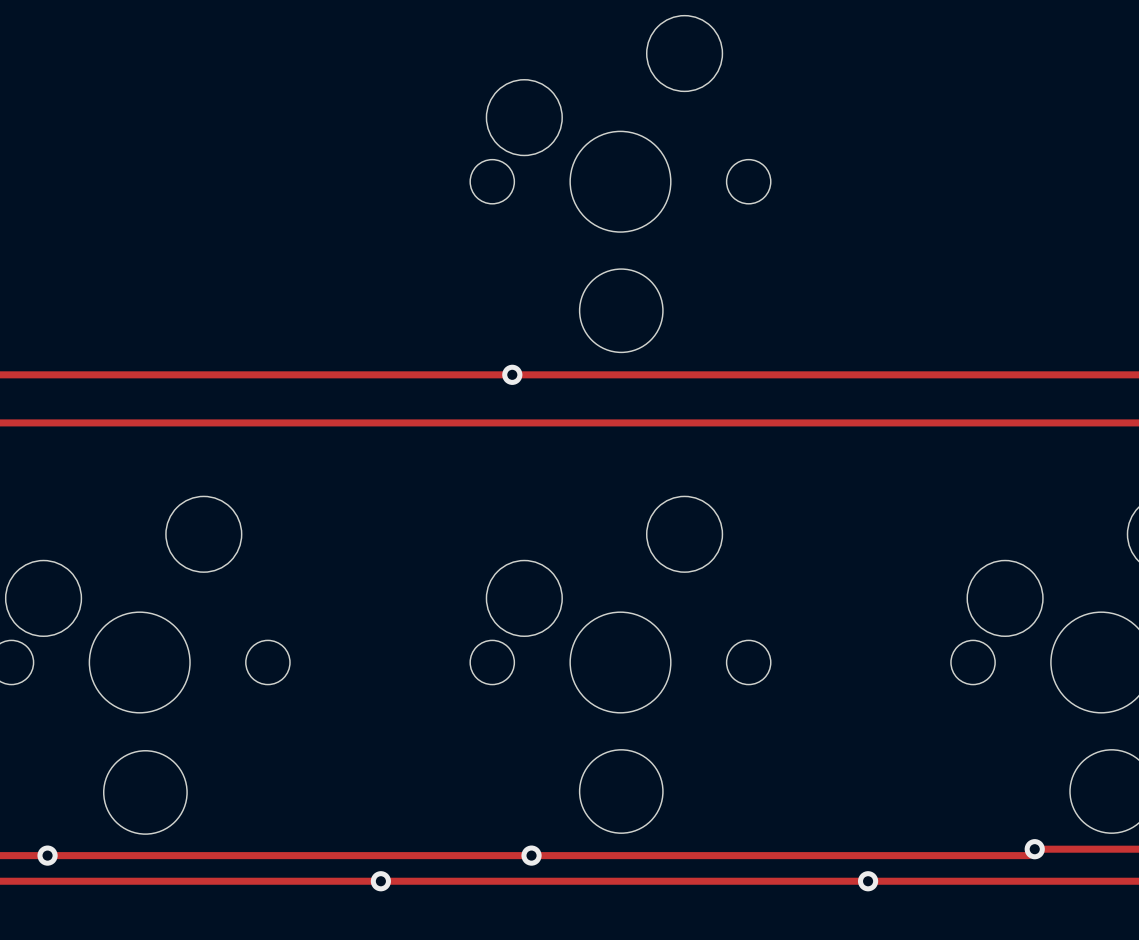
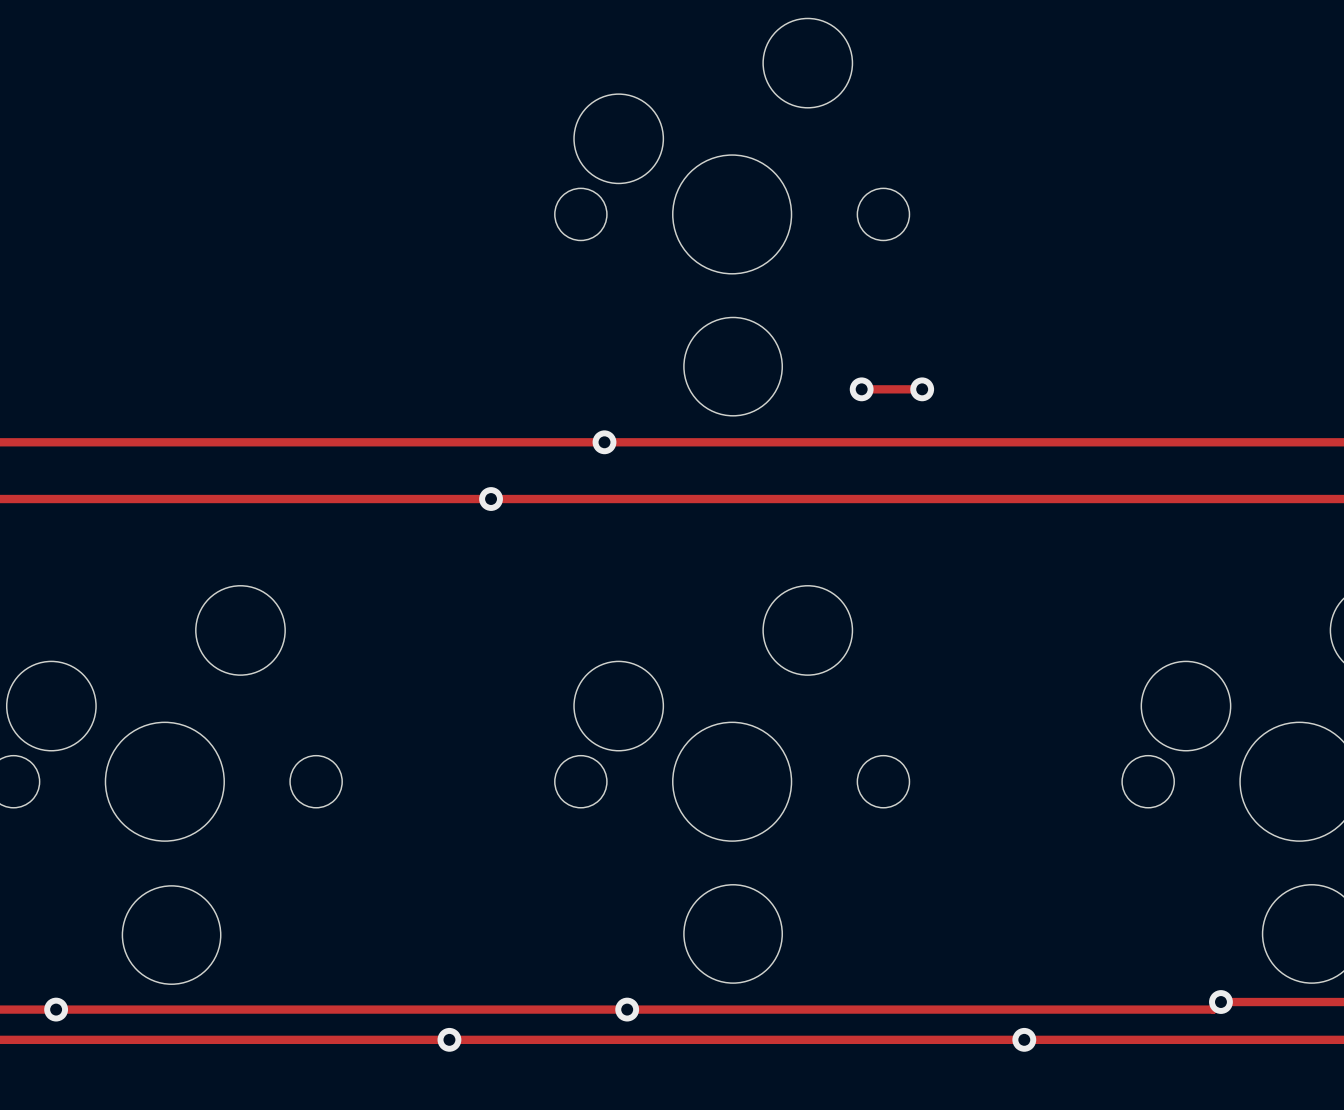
track: none -> (861, 389) (922, 389)
via: none -> (861, 389)
via: none -> (922, 389)
via: none -> (491, 499)

